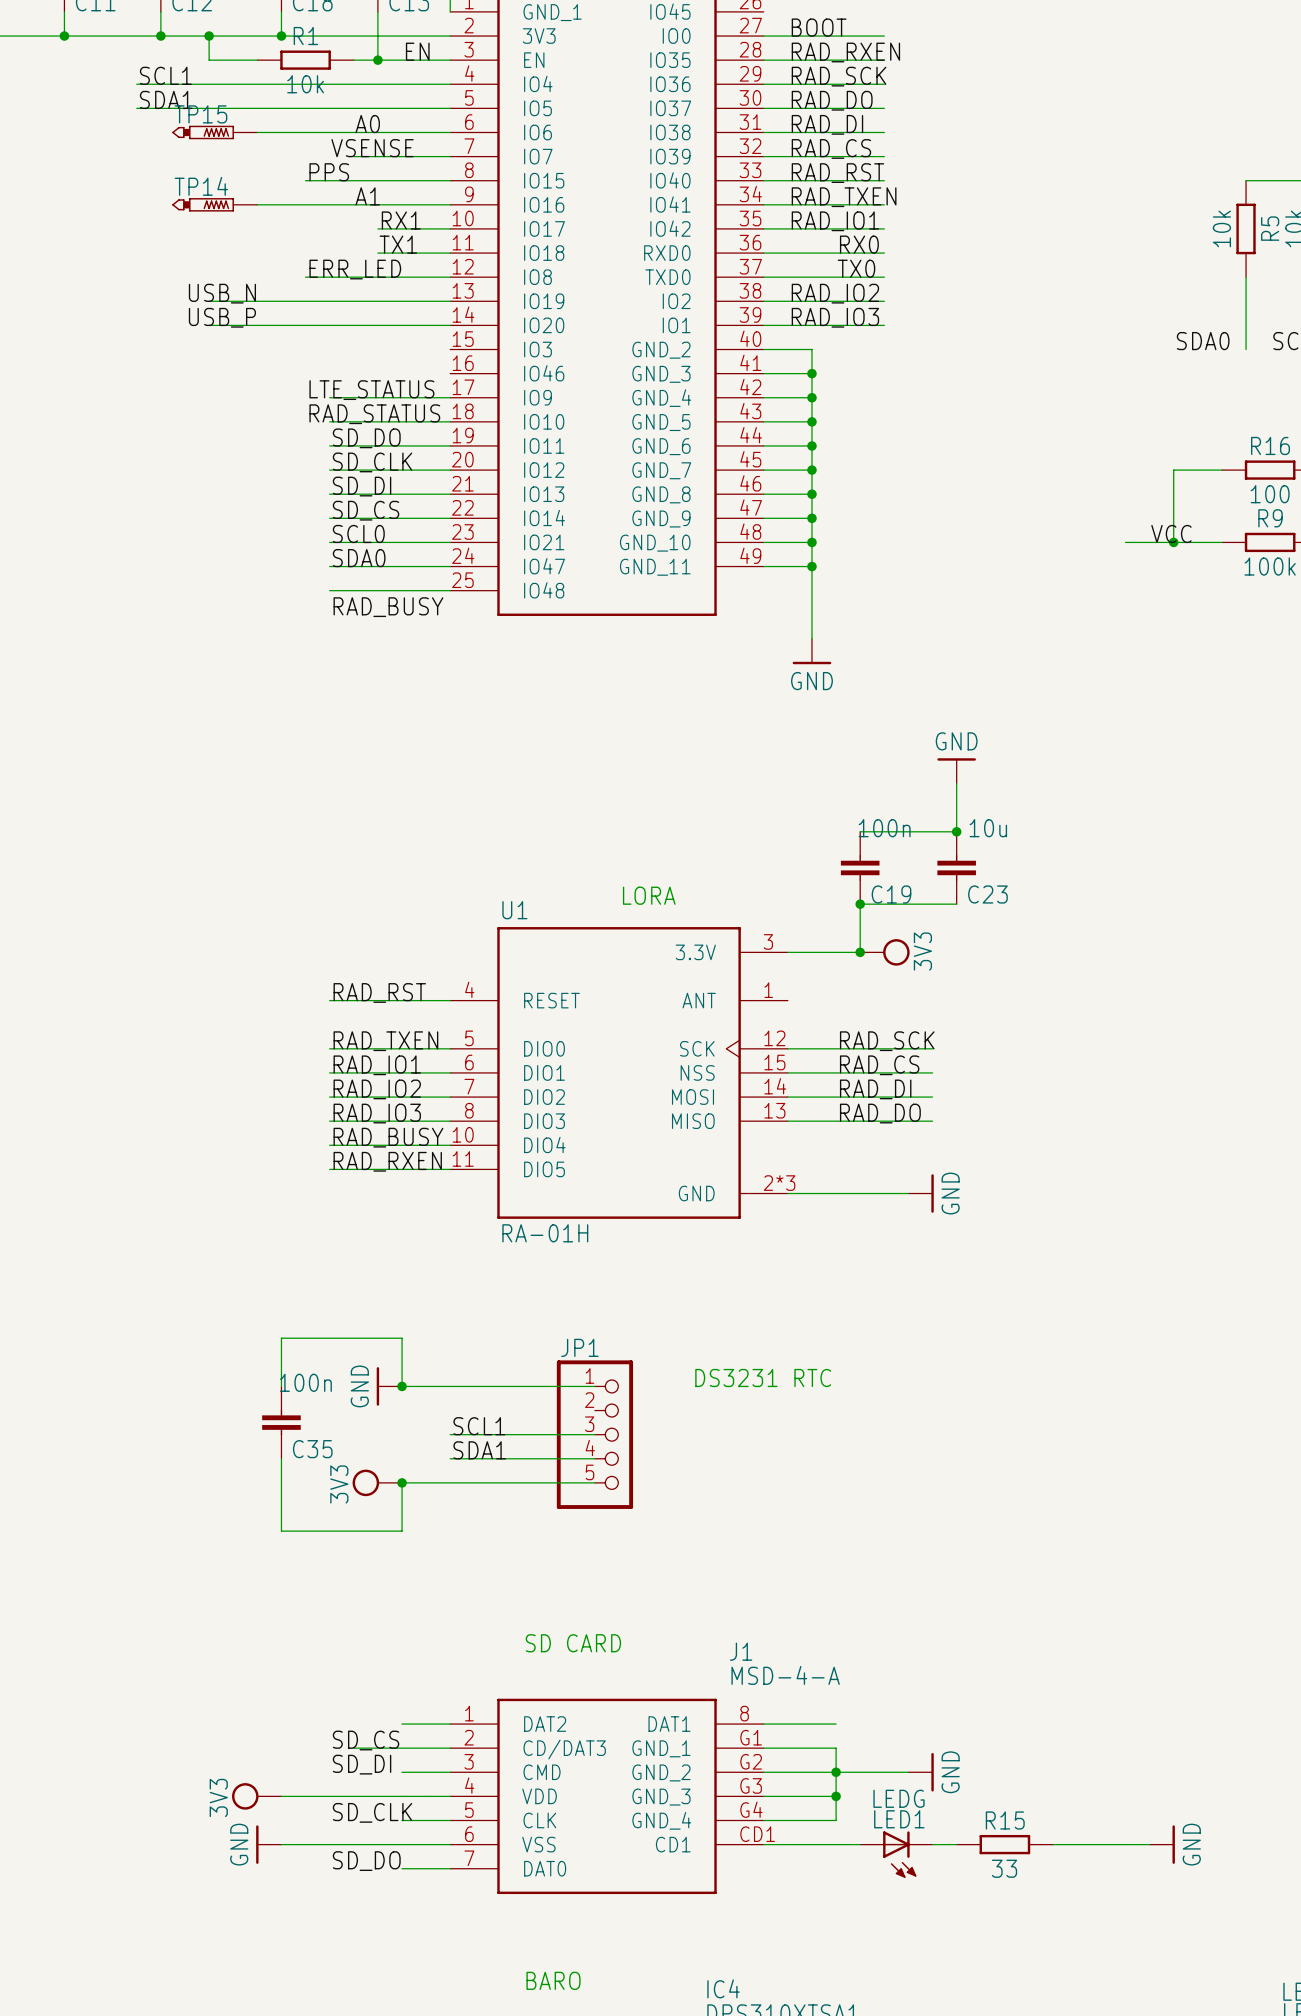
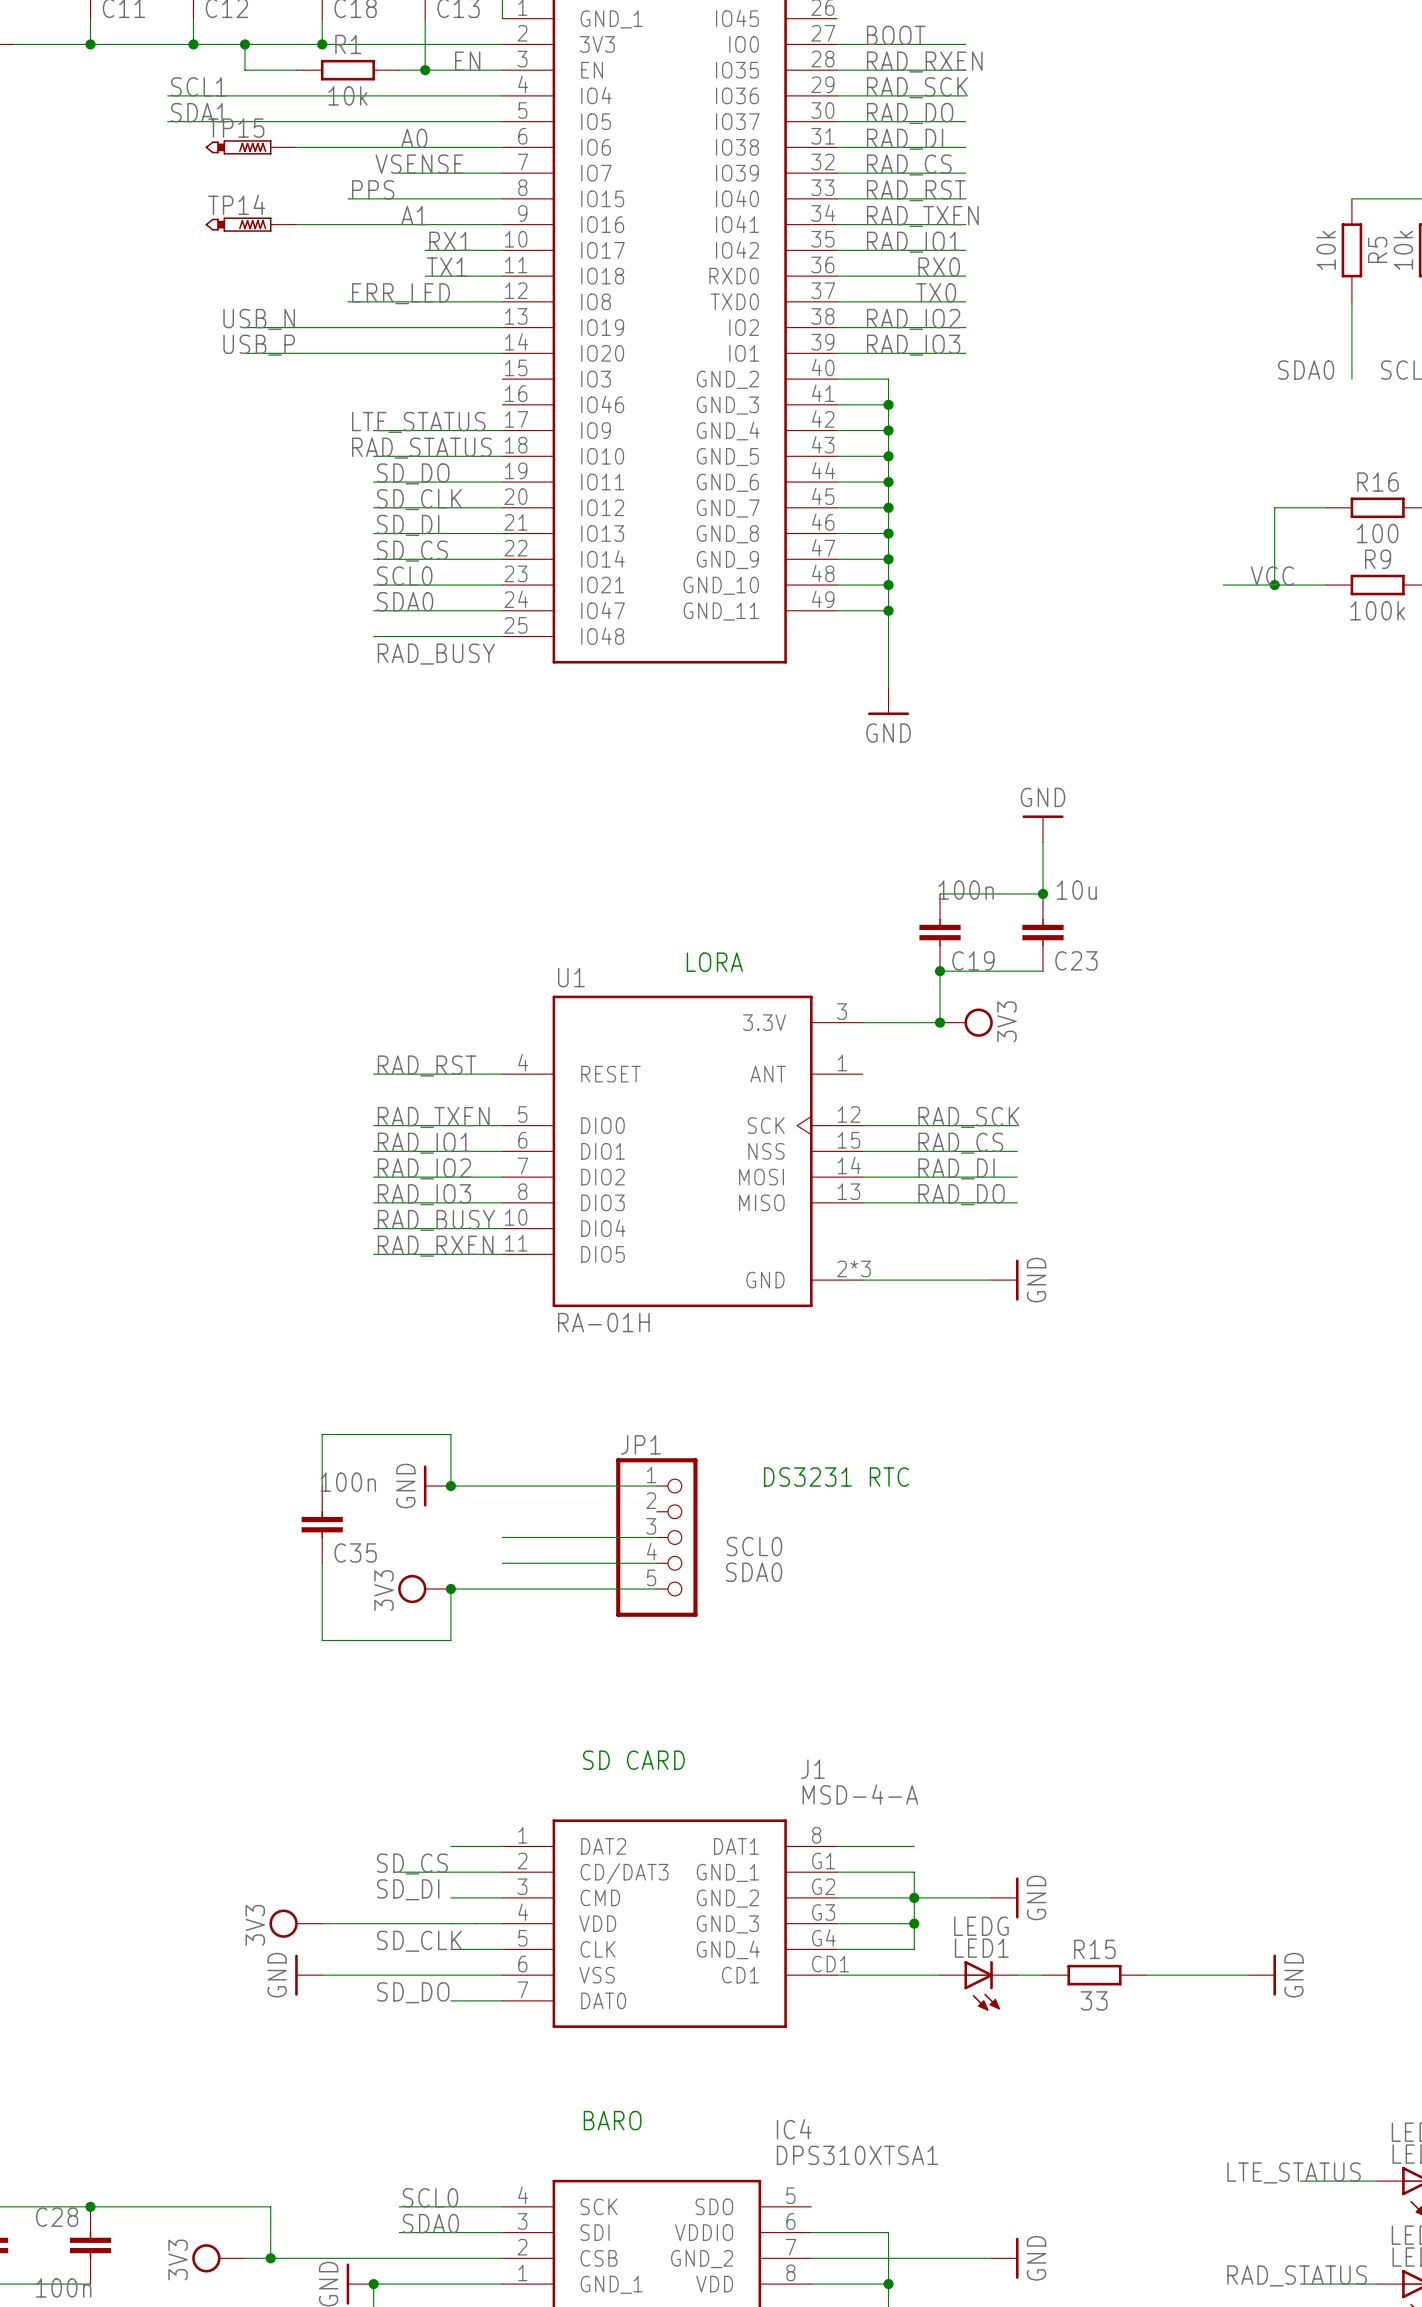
label: SCL1 (479, 1426) -> none
label: none -> SCL0 (754, 1546)
label: SDA1 (479, 1450) -> none
label: none -> SDA0 (754, 1572)

